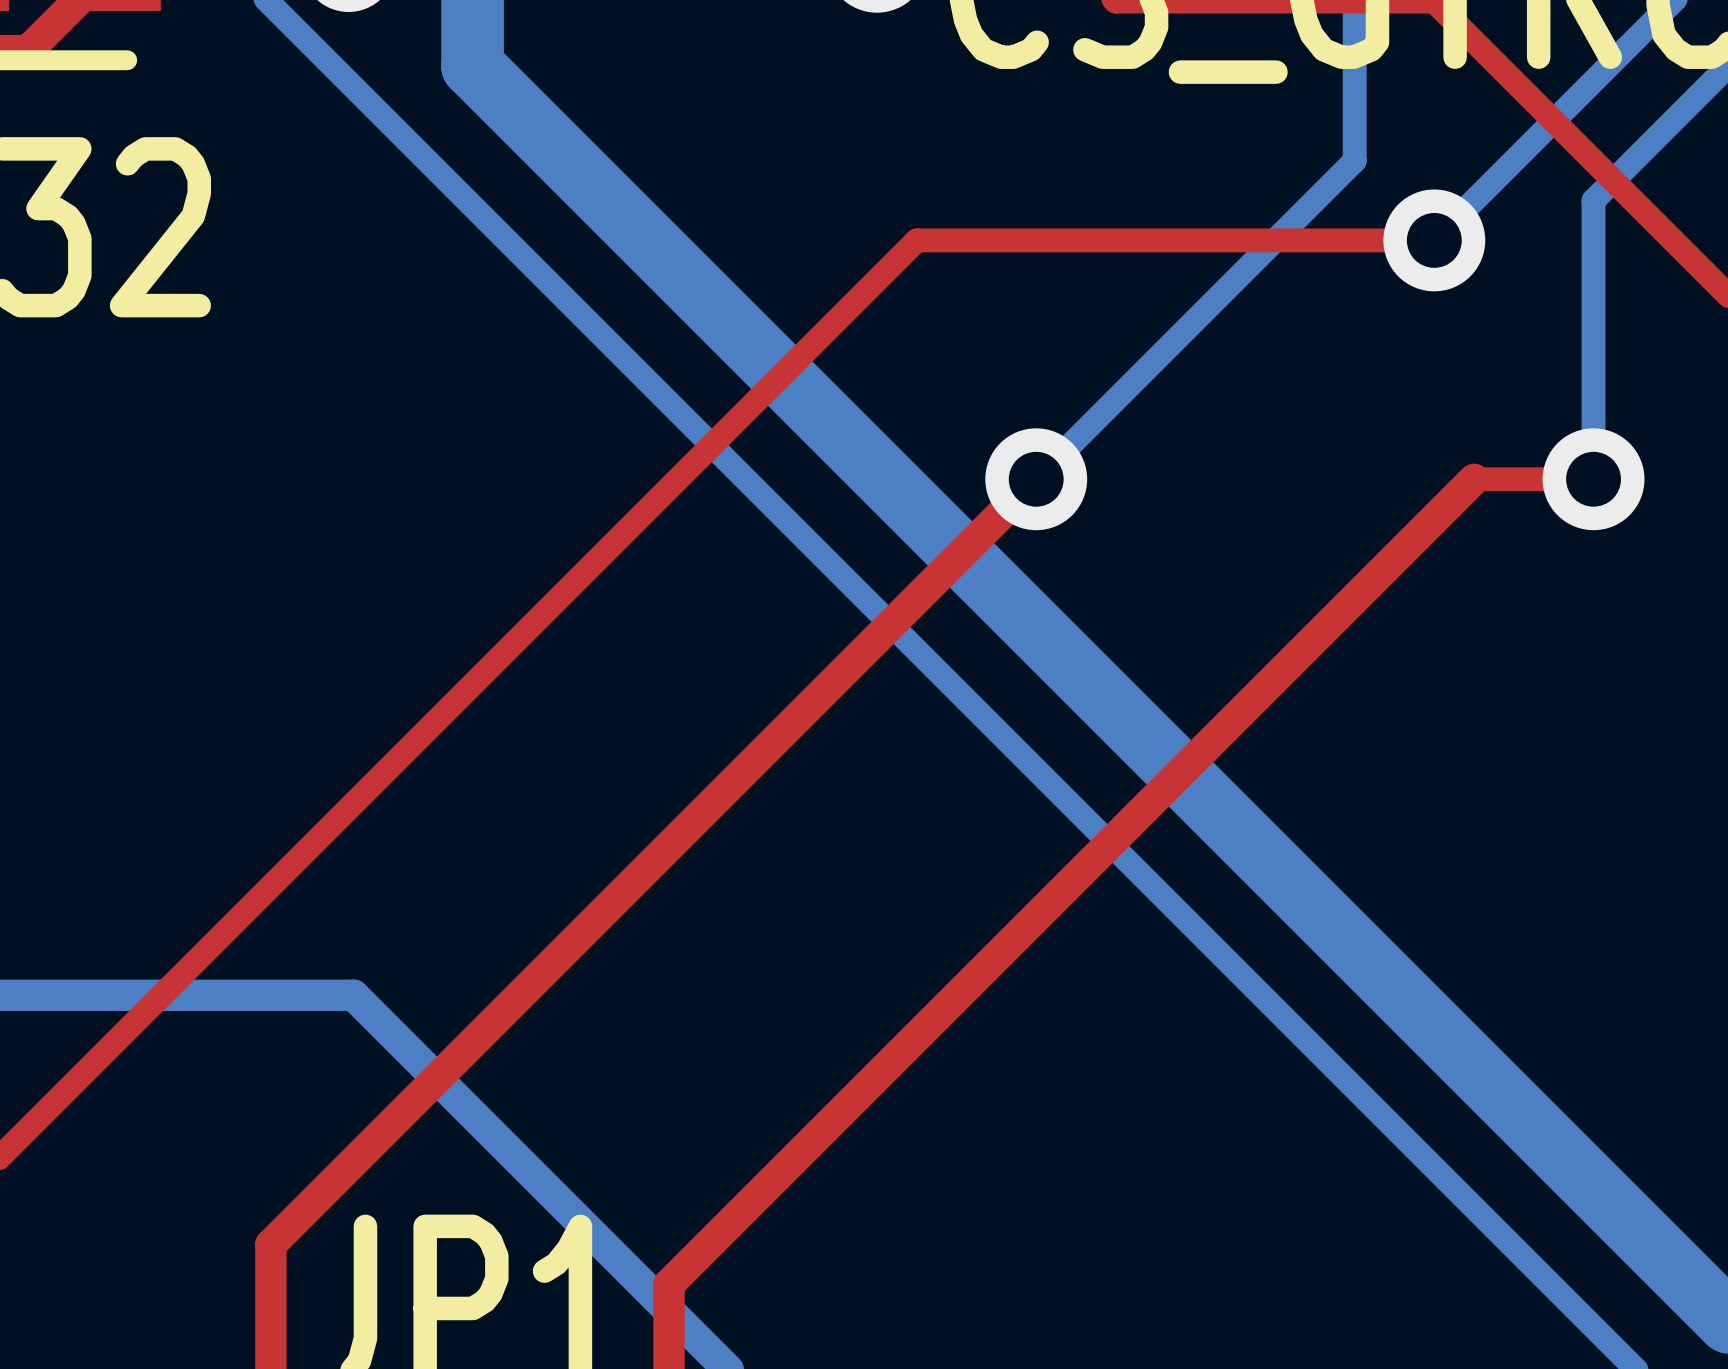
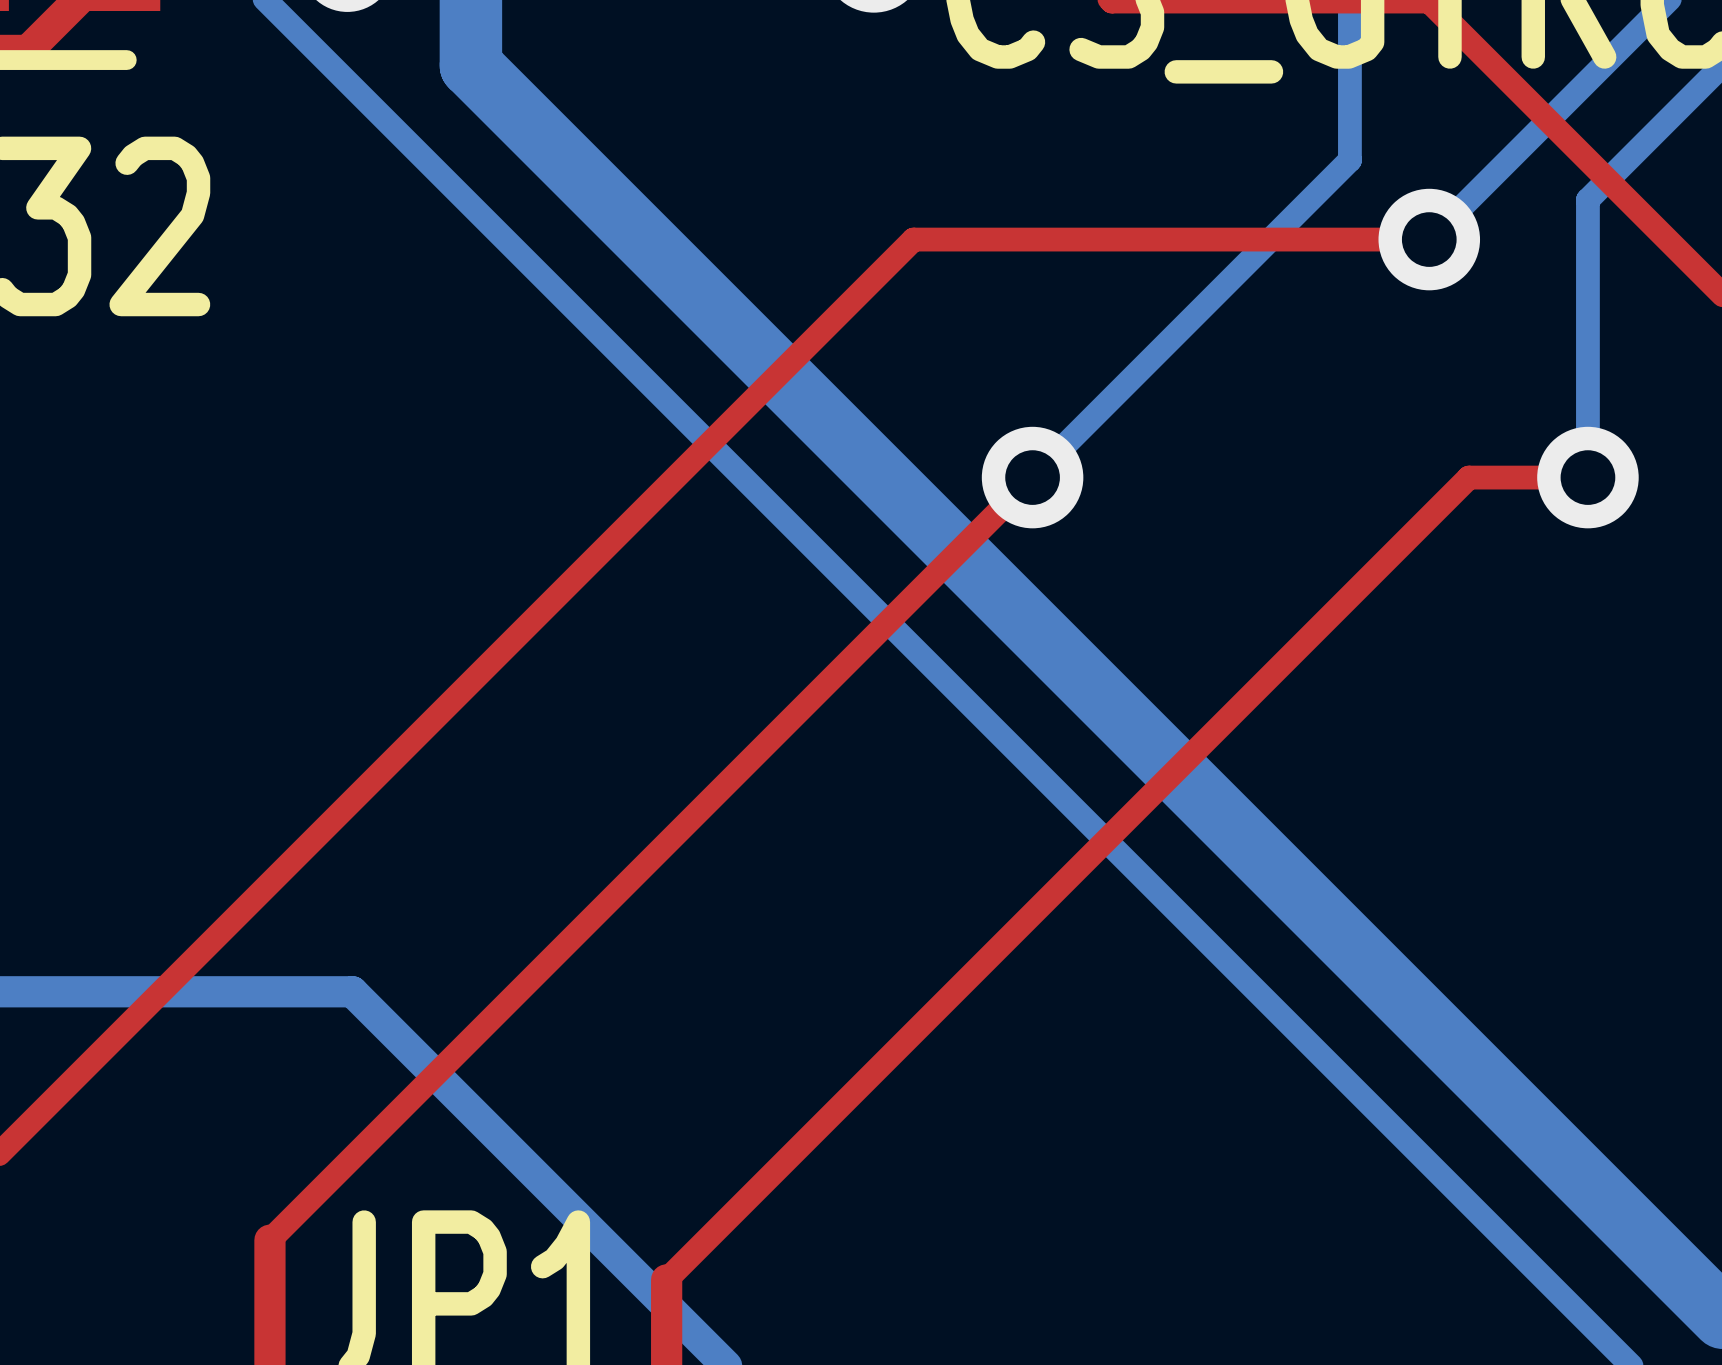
top track width: thick (1036, 479) (270, 1244) -> thin (1032, 477) (269, 1240)
top track width: thick (1474, 479) (668, 1284) -> thin (1468, 477) (666, 1279)

